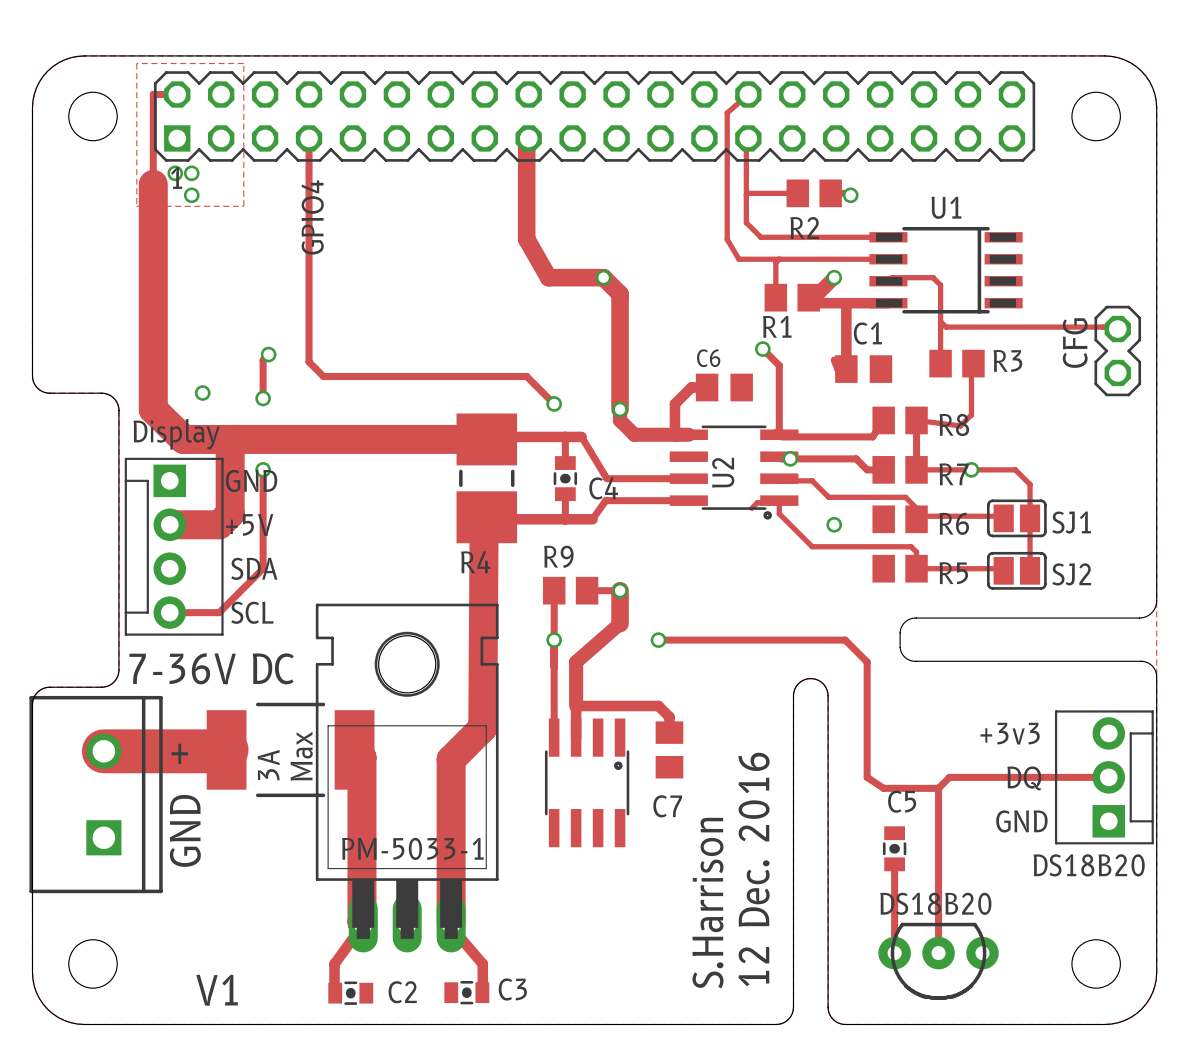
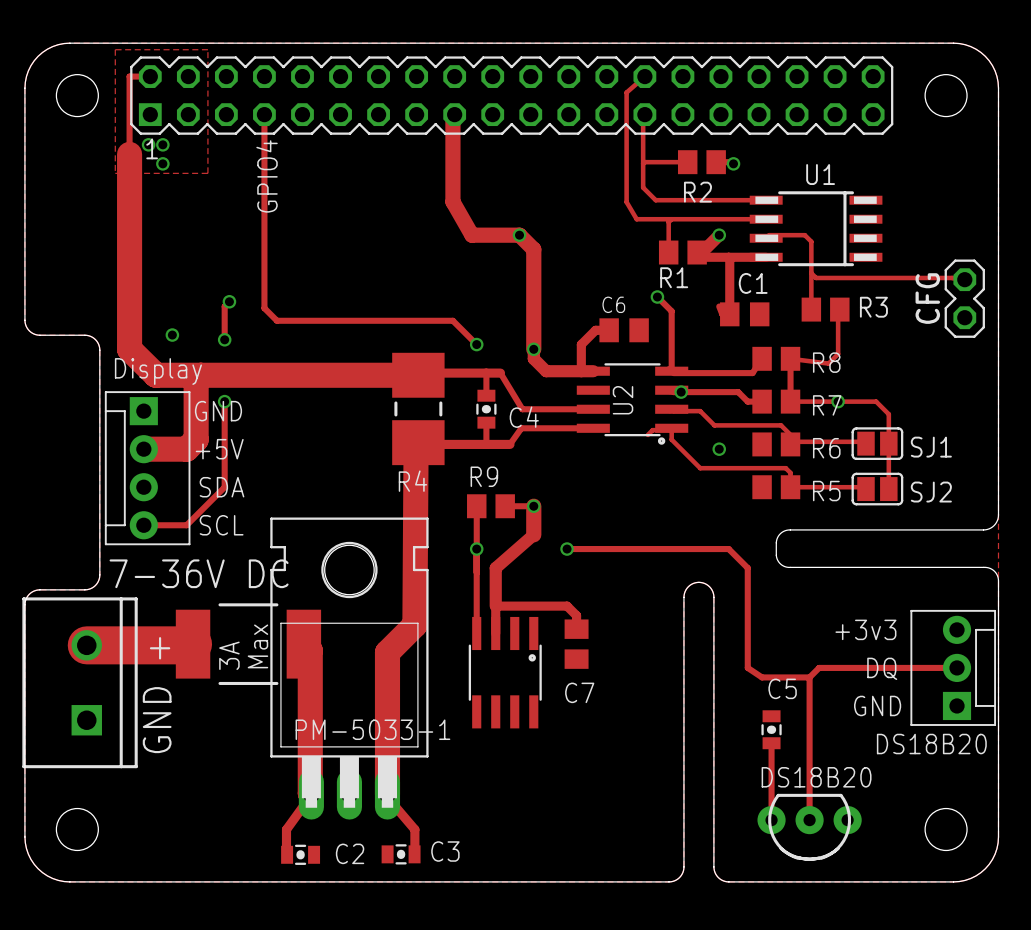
text: 12 Dec. 2016 (754, 869) -> none
text: S.Harrison (707, 903) -> none
text: V1 (217, 990) -> none

